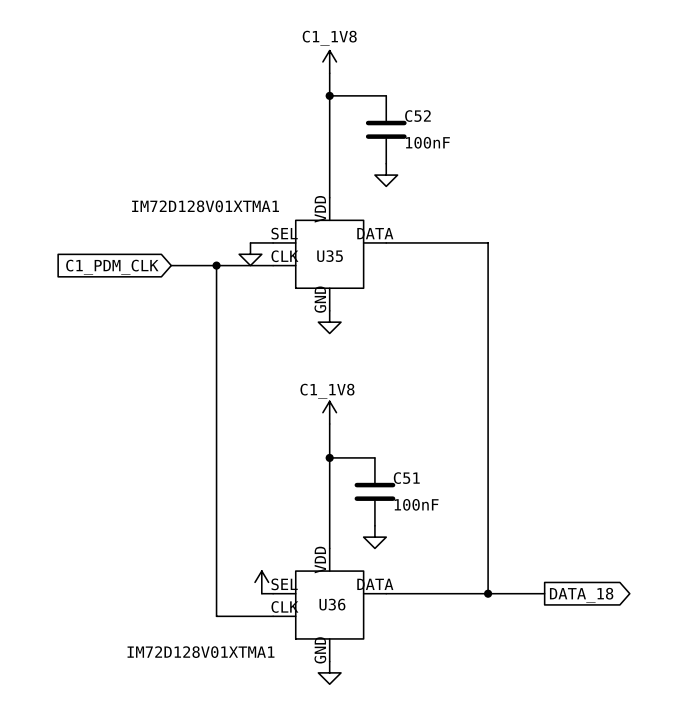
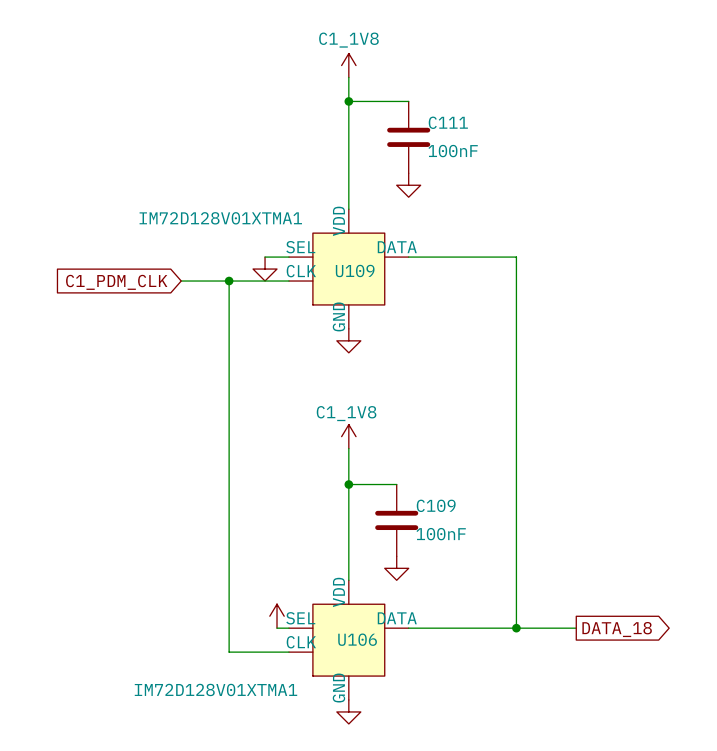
C52 name: C52 (417, 116) -> C111 (448, 122)
U35 name: U35 (330, 256) -> U109 (355, 270)
C51 name: C51 (406, 478) -> C109 (436, 505)
U36 name: U36 (332, 604) -> U106 (357, 639)

